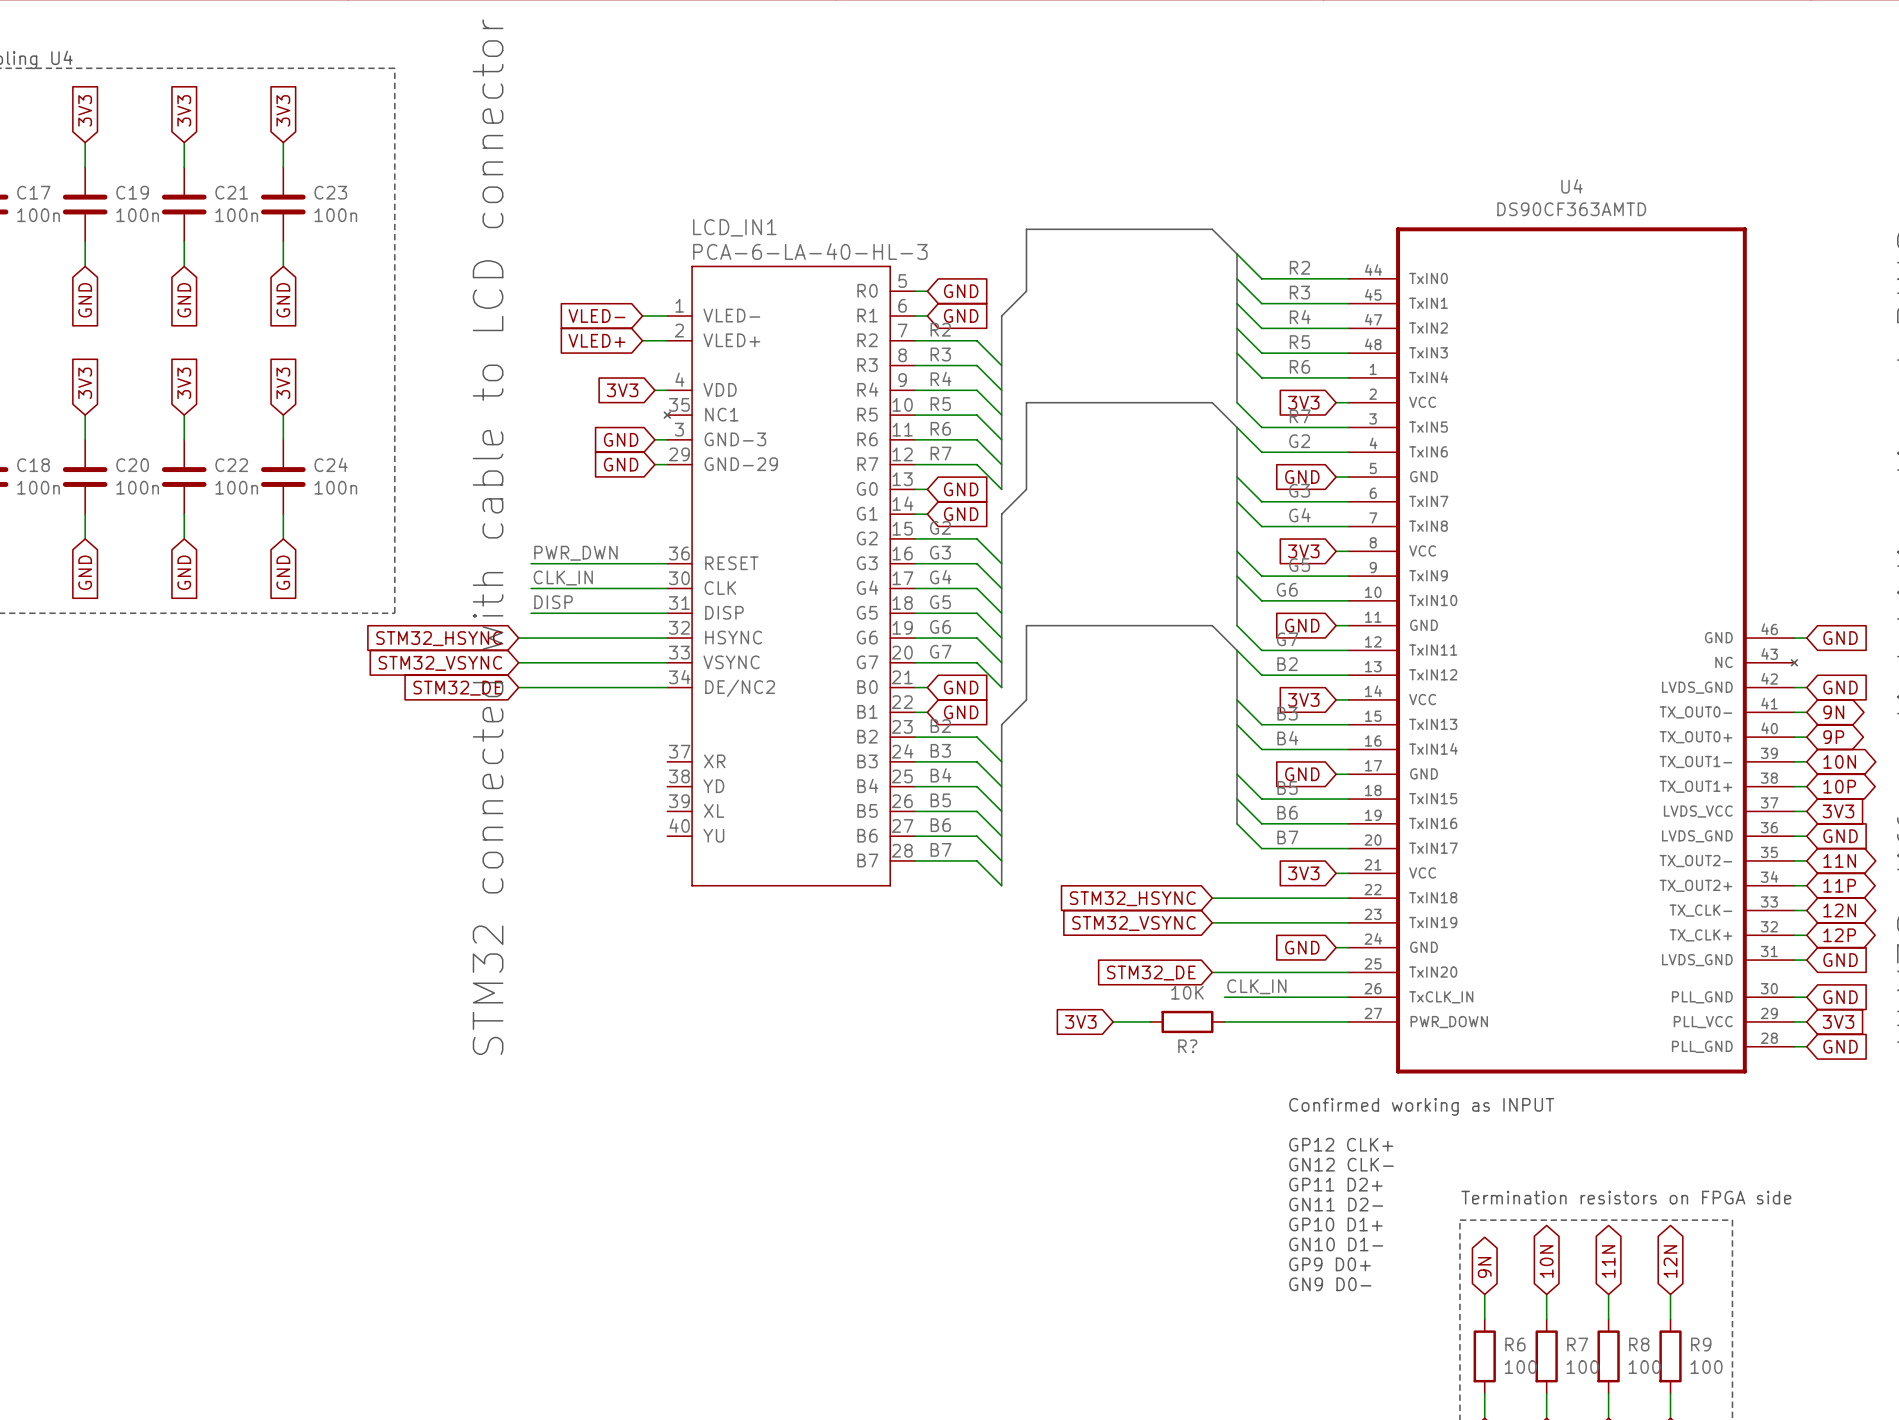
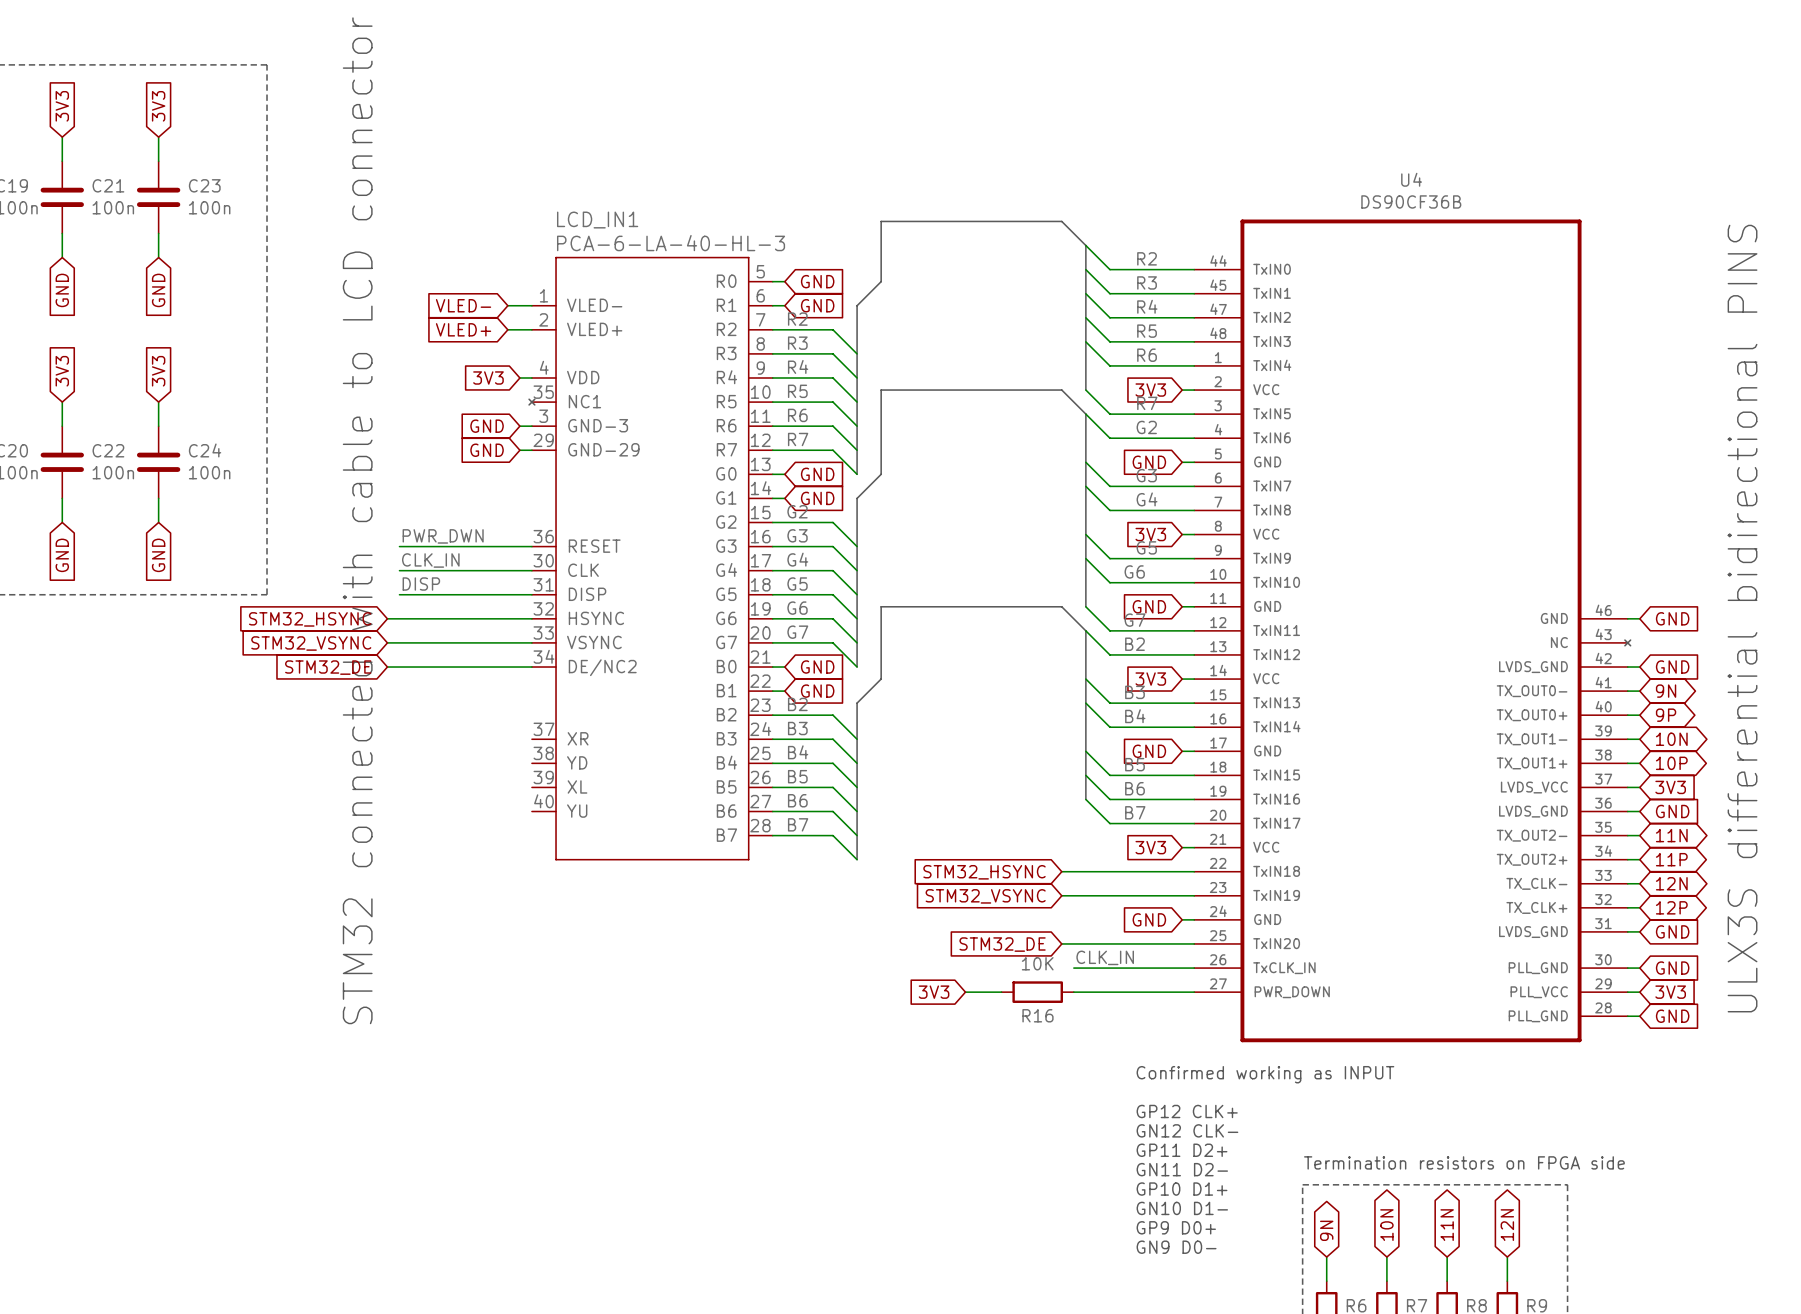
U4 value: DS90CF363AMTD (1571, 209) -> DS90CF36B (1411, 201)
R? name: R? (1187, 1046) -> R16 (1037, 1015)

